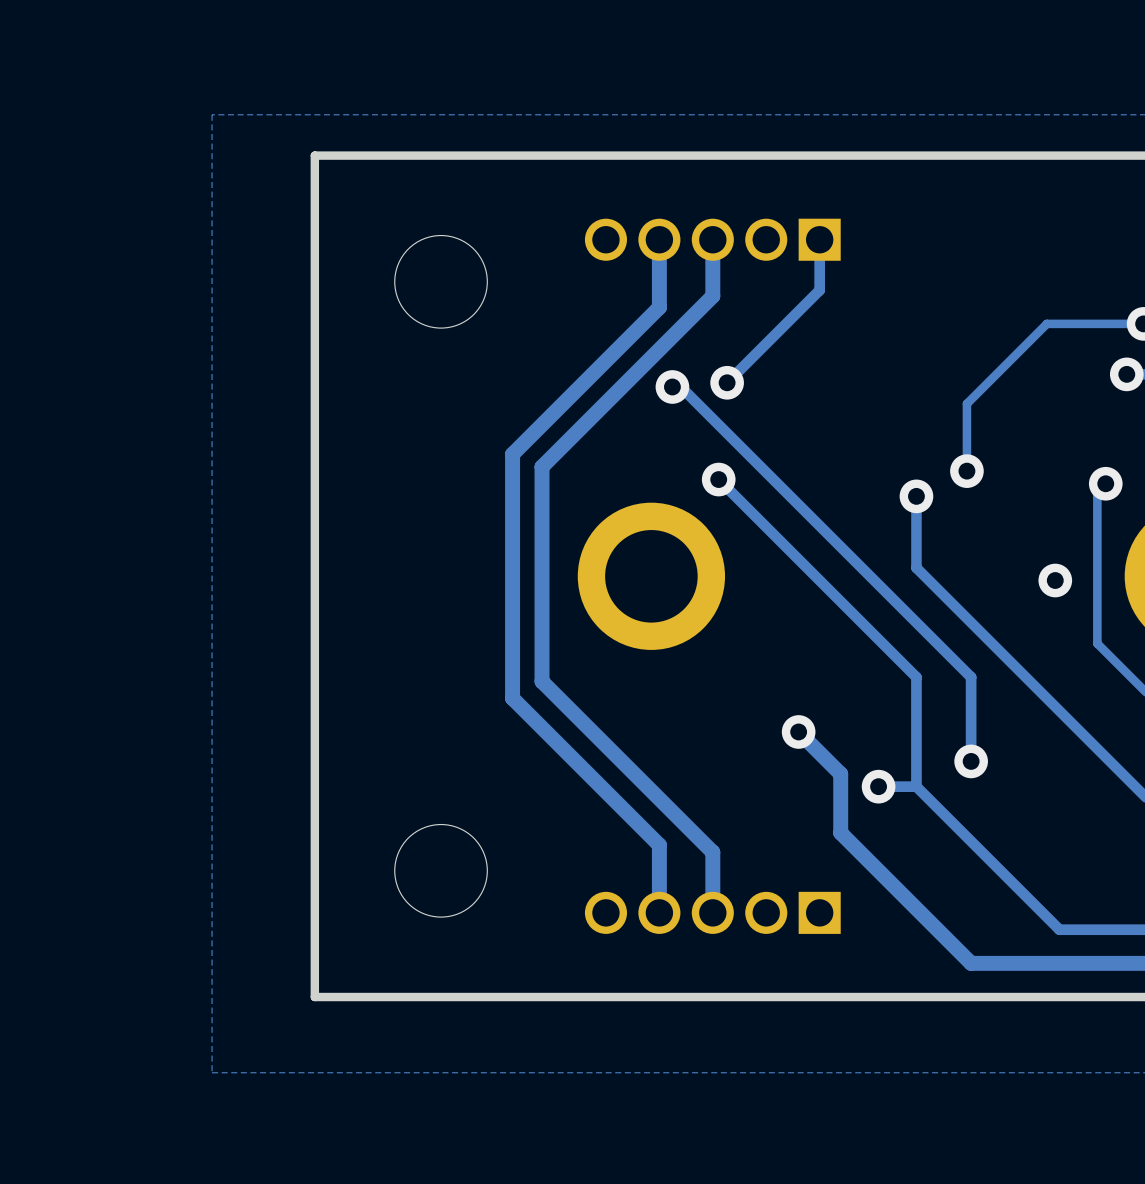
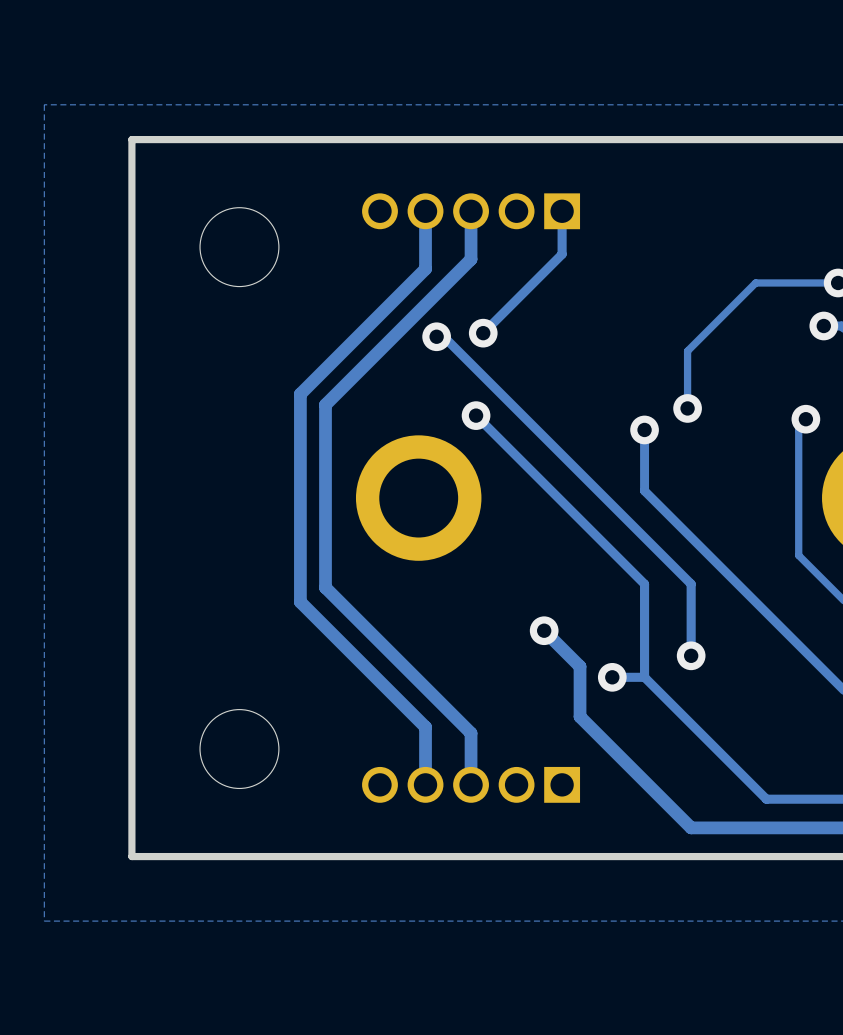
via: (1055, 580) -> none

